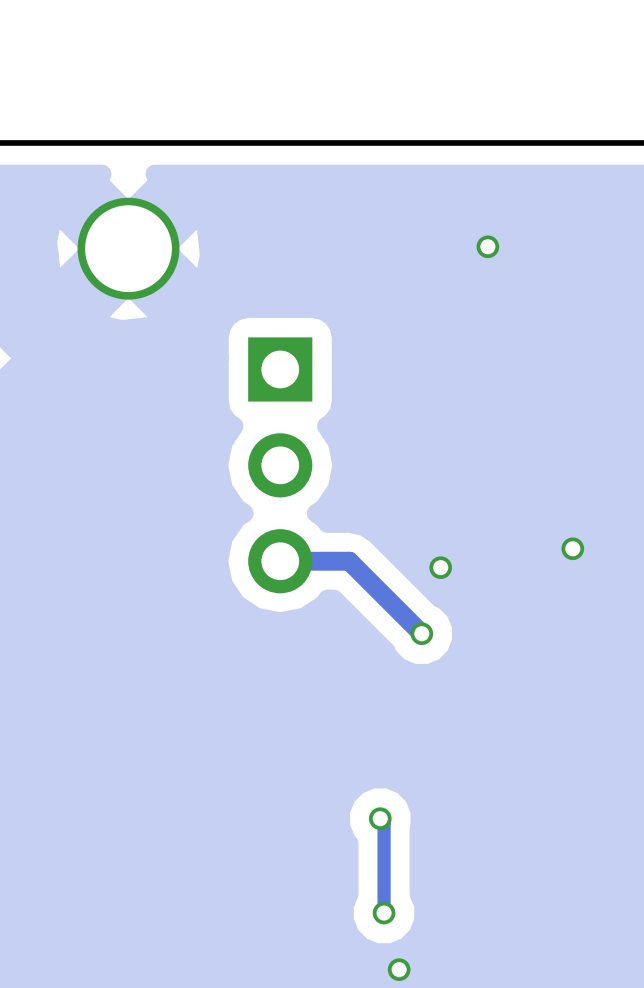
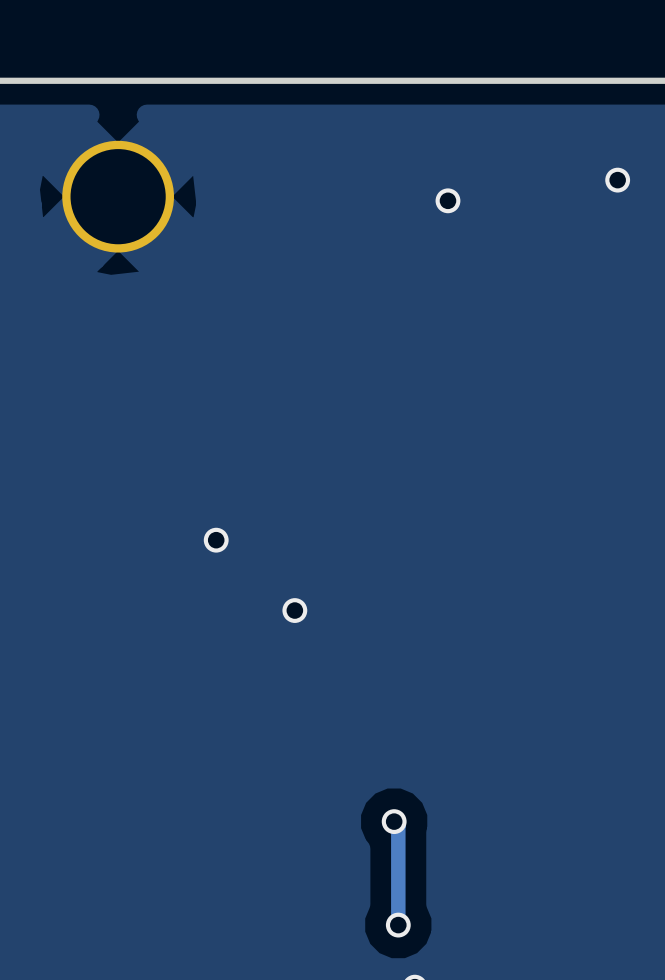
via: none -> (617, 180)
via: (487, 246) -> none
via: none -> (447, 200)
part: (280, 465) -> none
via: (572, 548) -> none
via: none -> (216, 540)
track: (280, 561) (349, 561) (421, 633) -> none
via: (440, 567) -> none
via: none -> (294, 610)
via: (421, 633) -> none

